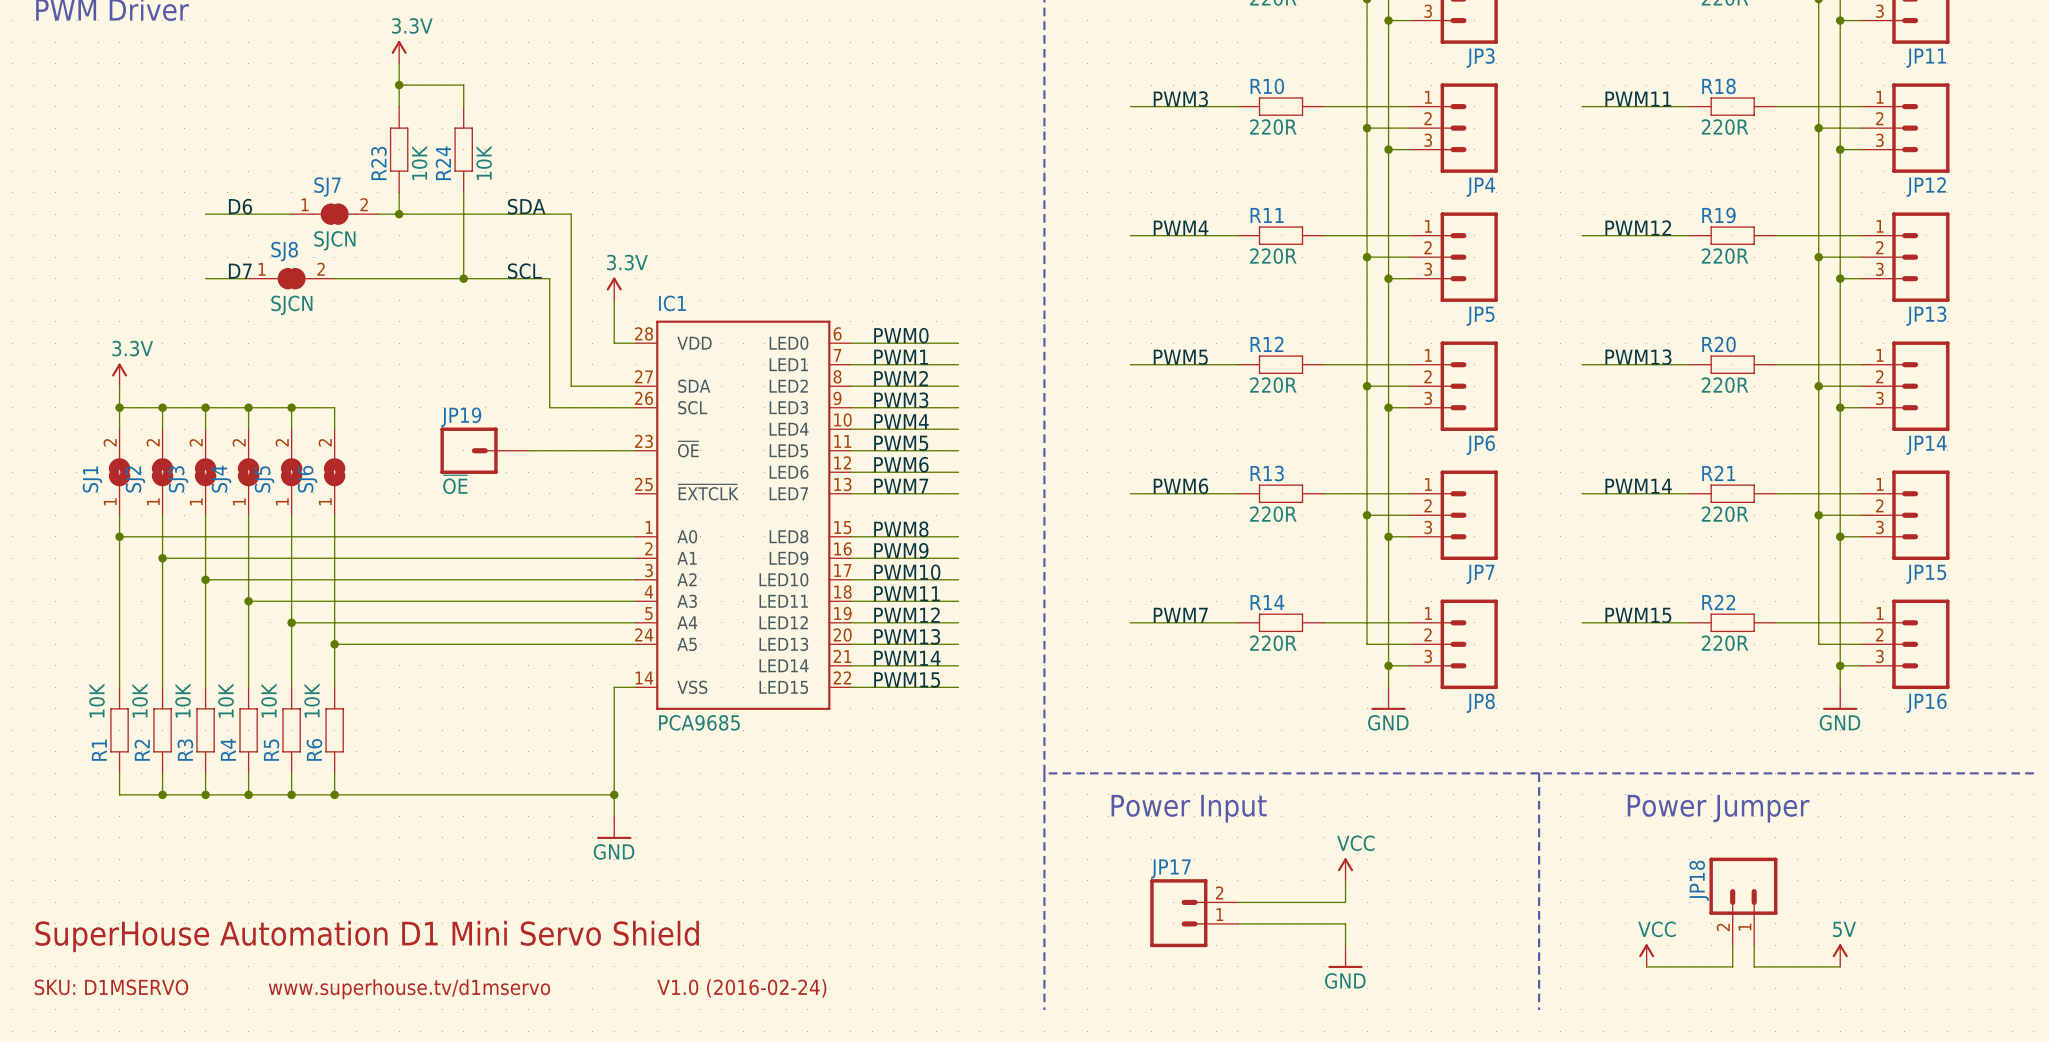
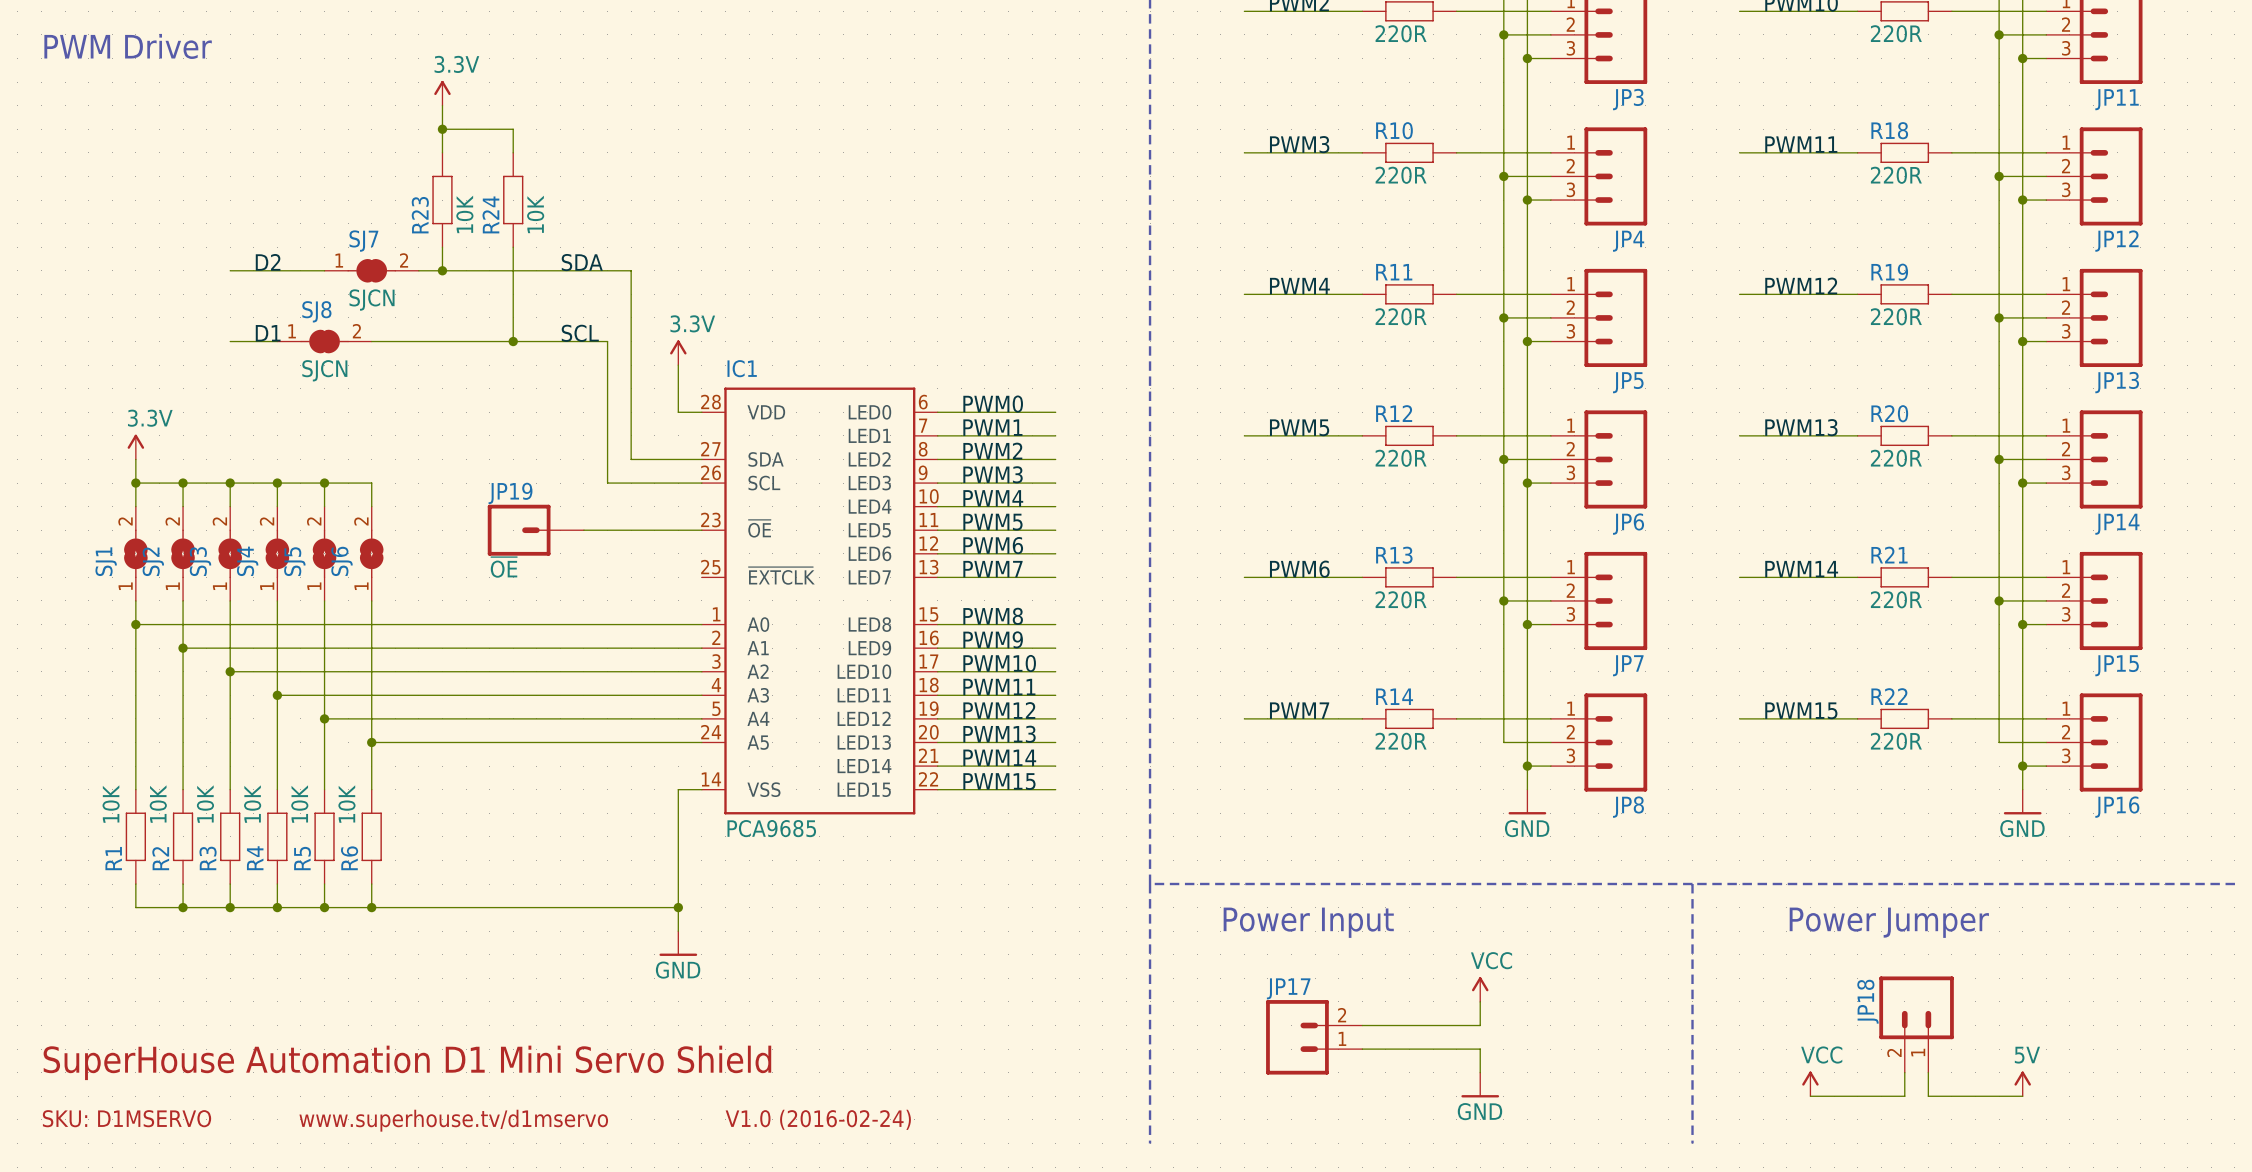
label: D6 (240, 206) -> D2 (268, 262)
label: D7 (240, 271) -> D1 (268, 333)

